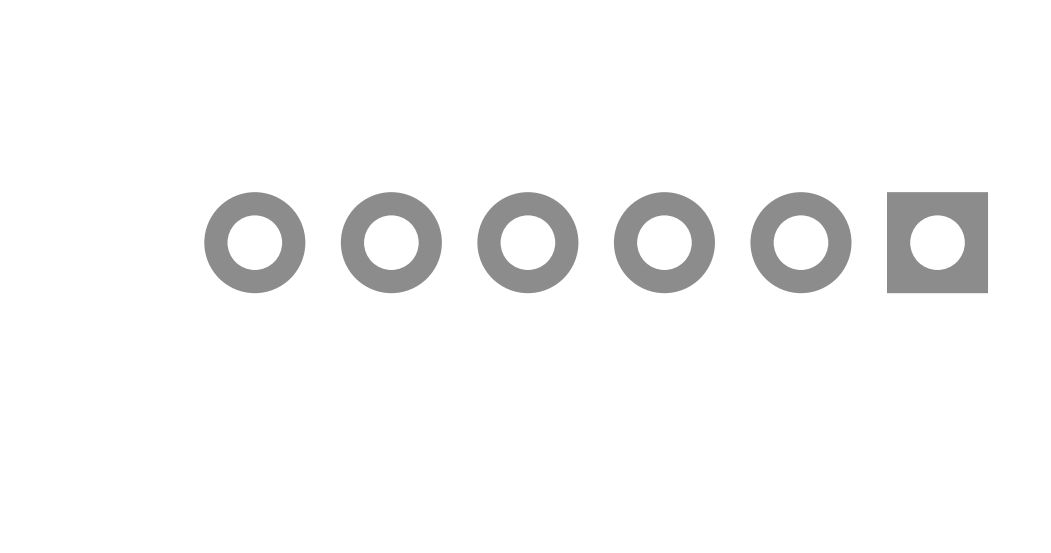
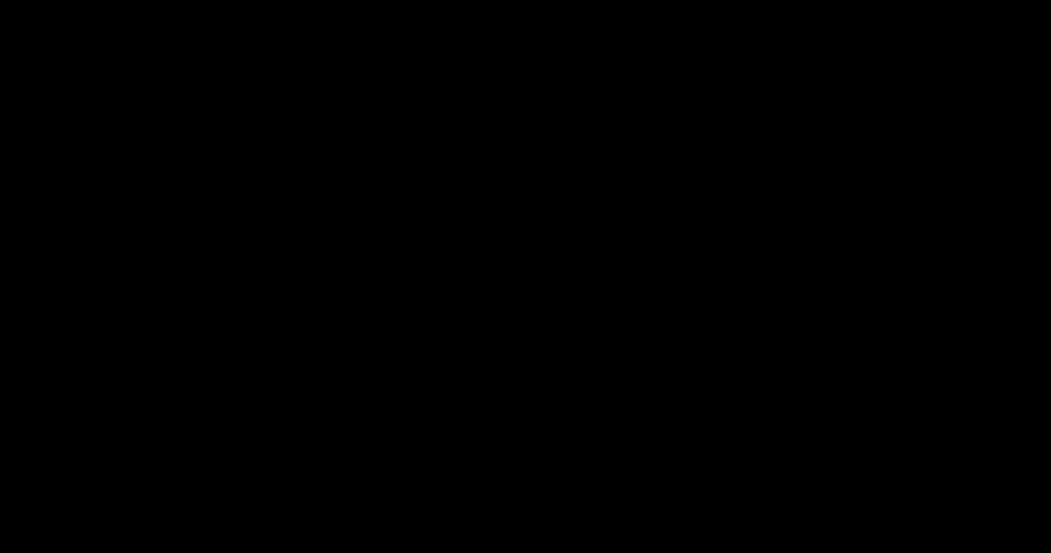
part: (596, 242) -> none

